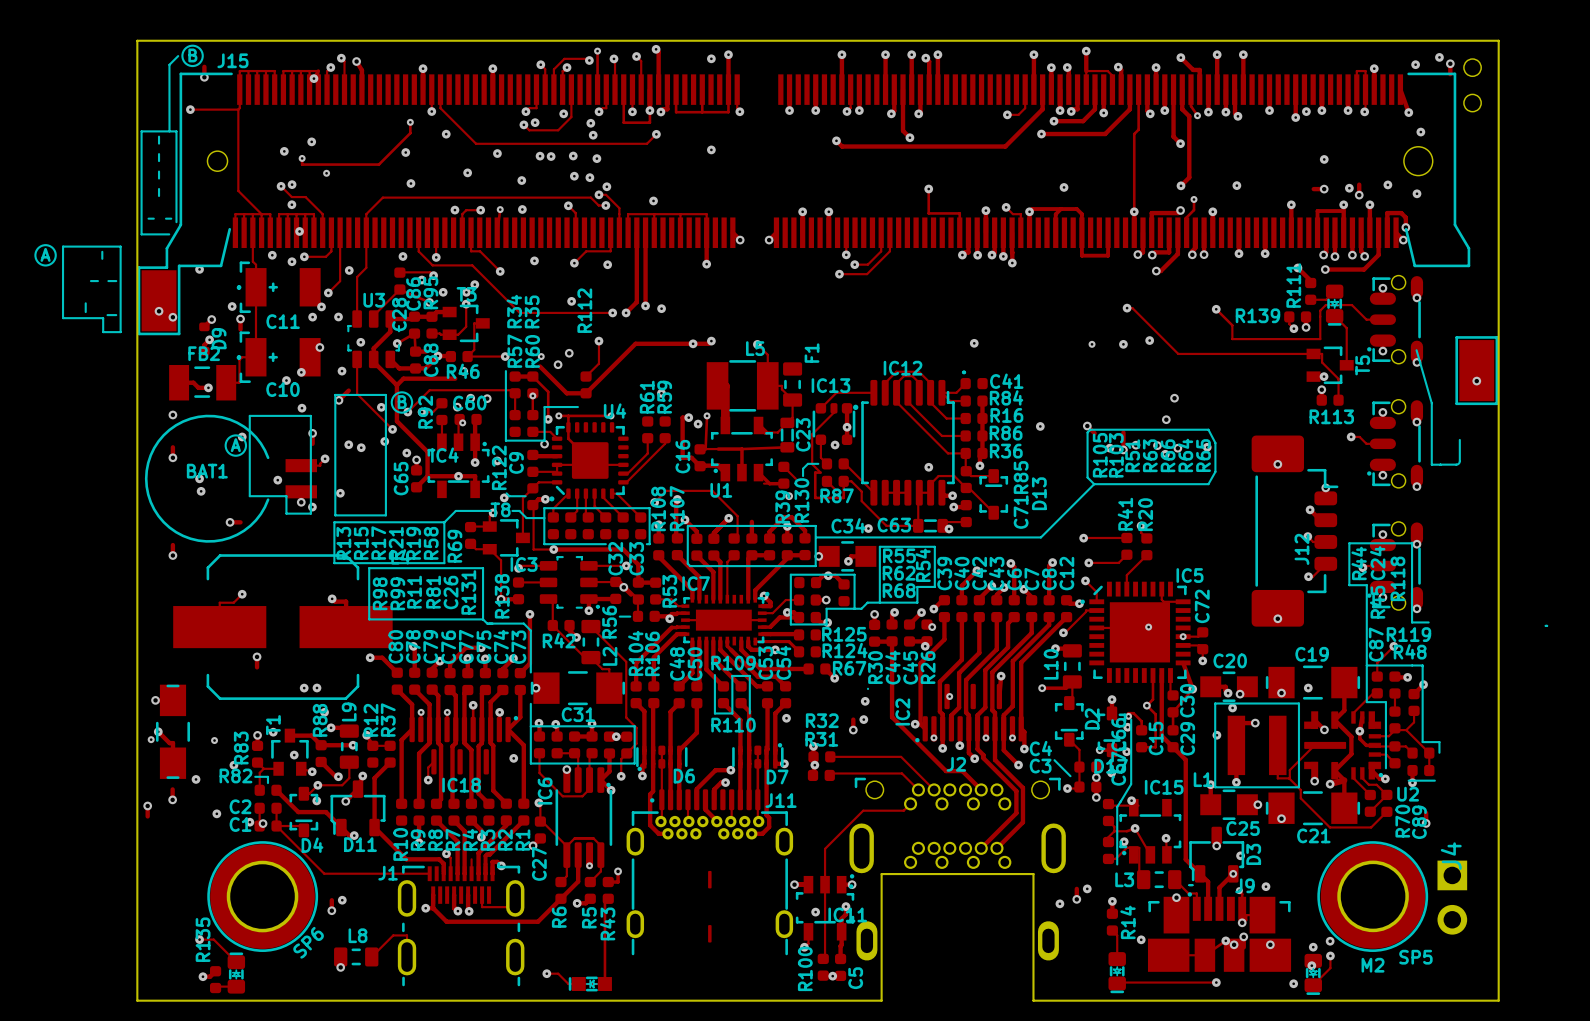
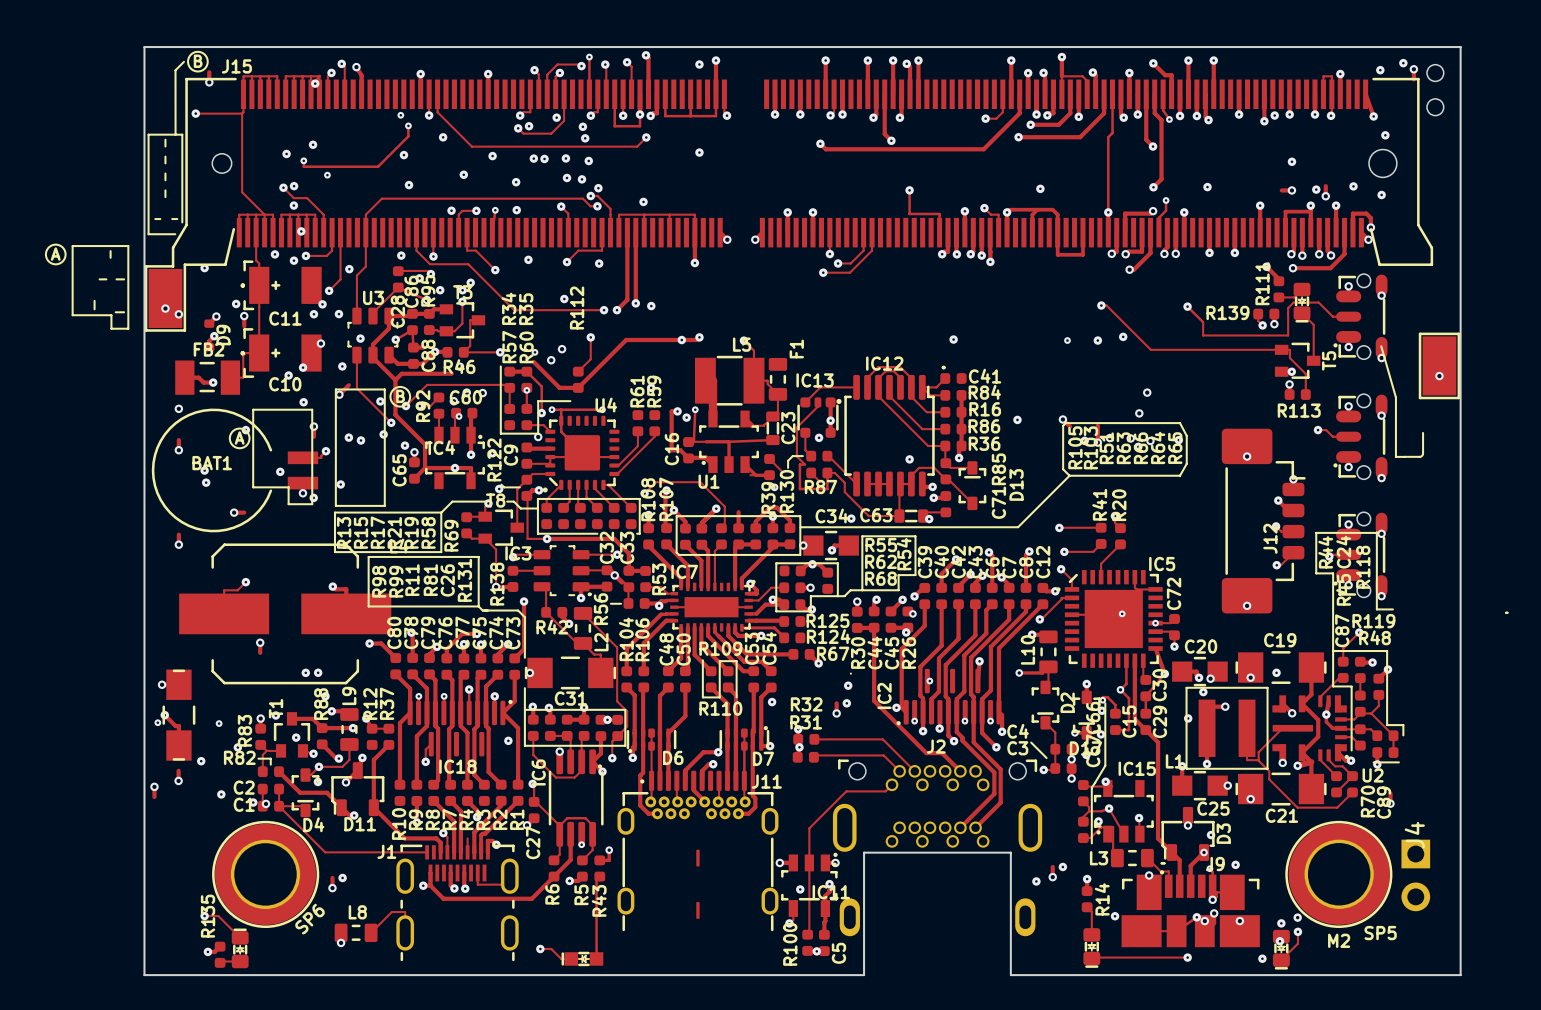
via: none -> (400, 115)

